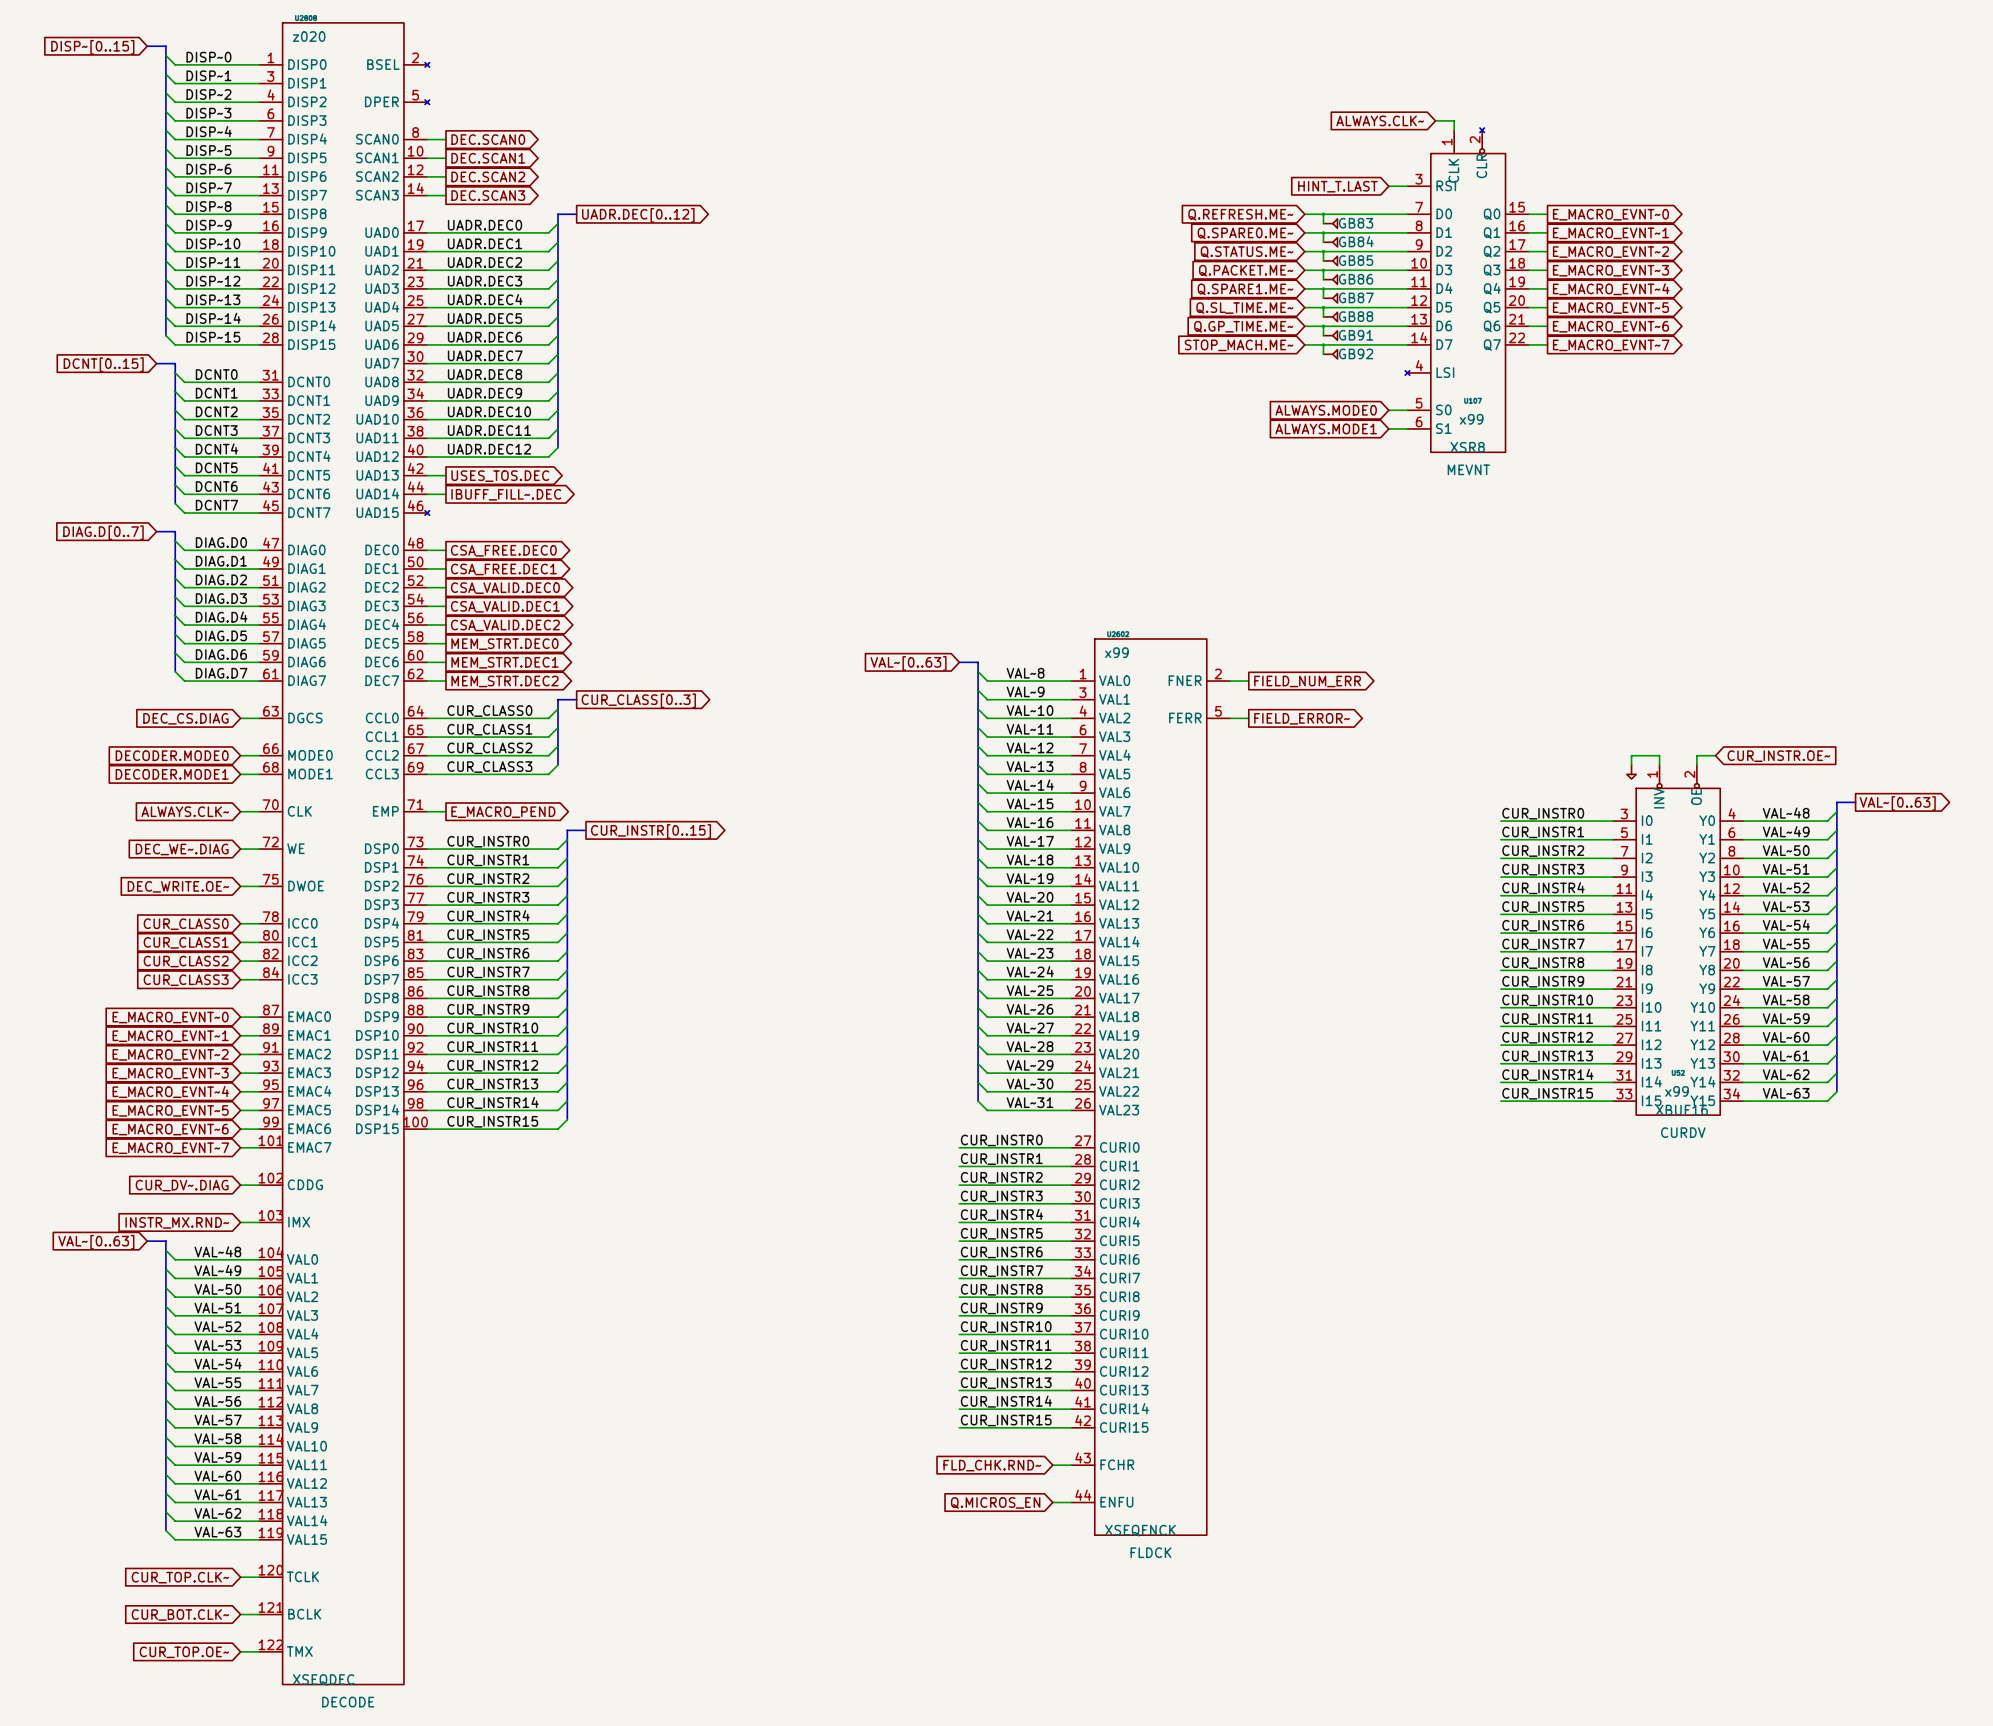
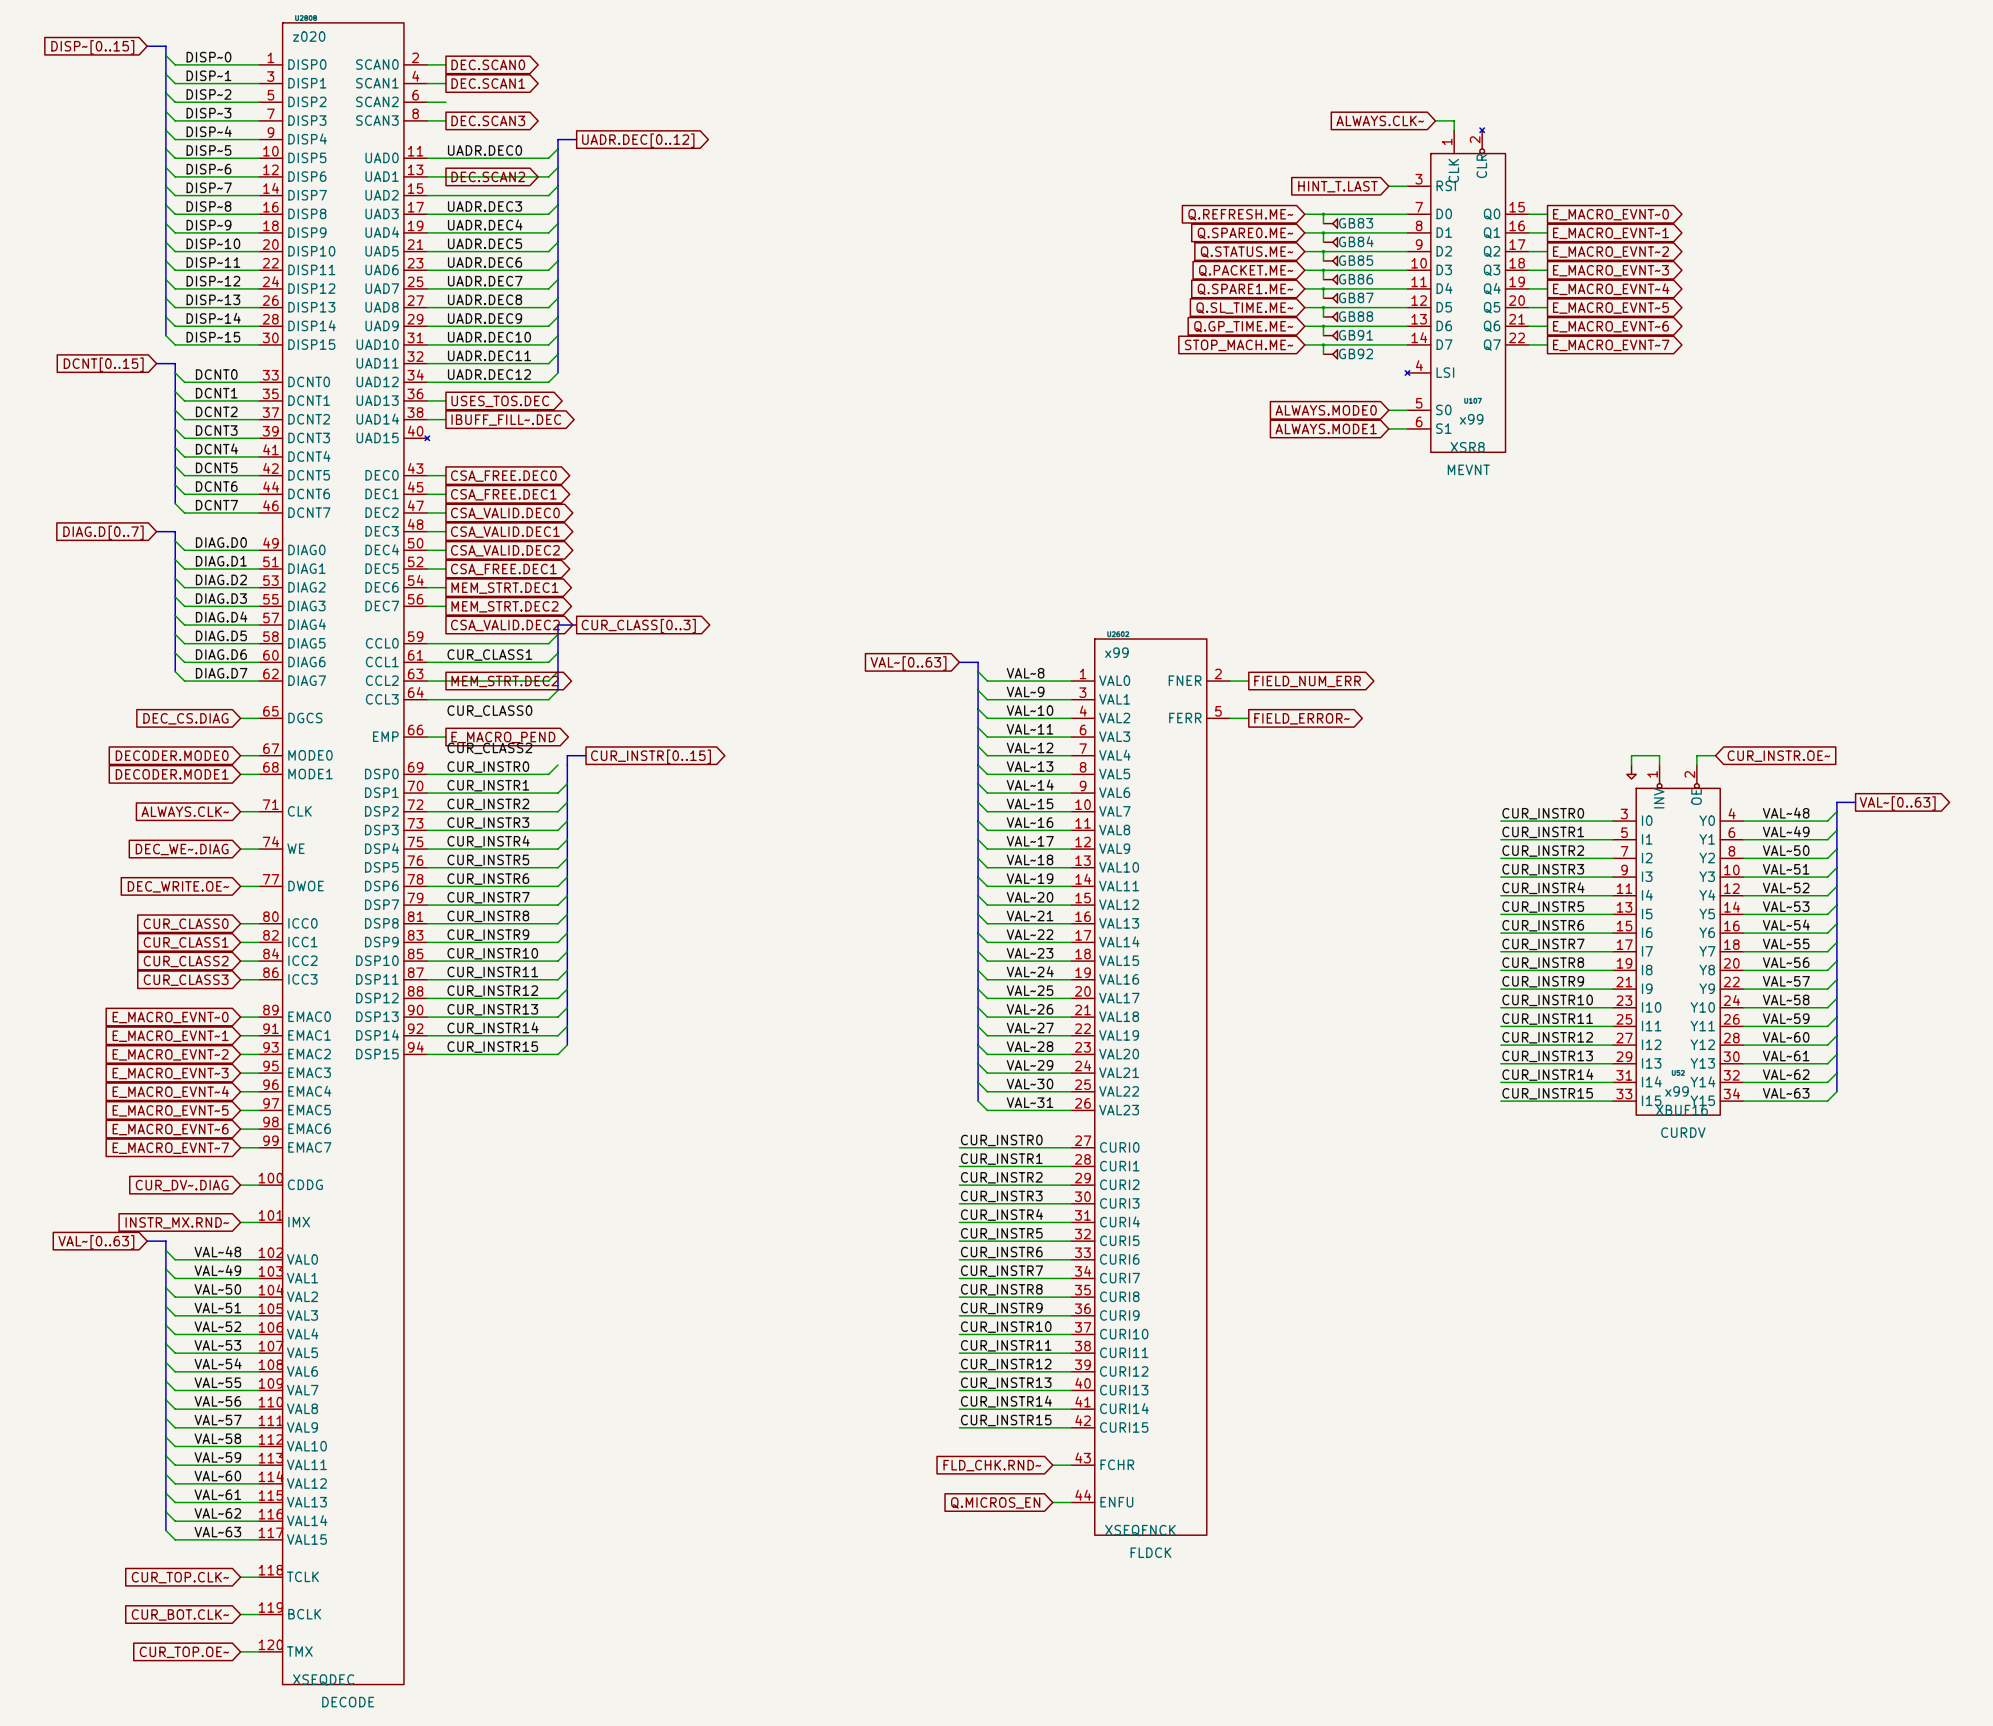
part symbol: [259, 22, 428, 1685] -> [259, 22, 428, 1685]
wire: none -> (427, 64) (445, 64)
no-connect mark: (427, 64) -> none
wire: none -> (427, 102) (445, 102)
no-connect mark: (427, 102) -> none
wire: none -> (427, 120) (445, 120)
wire: (427, 139) (445, 139) -> (427, 83) (445, 83)
global label position: DEC.SCAN0 (488, 139) -> DEC.SCAN0 (488, 64)
wire: none -> (557, 148) (548, 158) (445, 158)
label: none -> UADR.DEC0 (485, 150)
global label position: DEC.SCAN1 (488, 158) -> DEC.SCAN1 (488, 83)
wire: none -> (557, 167) (548, 176) (445, 176)
wire: none -> (557, 186) (548, 195) (445, 195)
global label position: DEC.SCAN3 (488, 195) -> DEC.SCAN3 (488, 120)
wire: none -> (557, 204) (548, 214) (427, 214)
label: none -> UADR.DEC3 (485, 206)
bus: (557, 214) (576, 214) -> (557, 214) (557, 139) (576, 139)
global label position: UADR.DEC[0..12] (638, 215) -> UADR.DEC[0..12] (638, 140)
label: UADR.DEC0 (485, 225) -> UADR.DEC4 (485, 224)
label: UADR.DEC1 (485, 243) -> UADR.DEC5 (485, 243)
label: UADR.DEC2 (485, 262) -> UADR.DEC6 (485, 262)
label: UADR.DEC3 (485, 281) -> UADR.DEC7 (485, 281)
label: UADR.DEC4 (485, 299) -> UADR.DEC8 (485, 299)
label: UADR.DEC5 (485, 318) -> UADR.DEC9 (485, 318)
label: UADR.DEC6 (485, 337) -> UADR.DEC10 (489, 337)
label: UADR.DEC7 (485, 355) -> UADR.DEC11 (489, 355)
bus: (557, 372) (557, 447) -> none
label: UADR.DEC8 (485, 374) -> UADR.DEC12 (489, 374)
wire: (557, 391) (548, 400) (445, 400) -> none
label: UADR.DEC9 (485, 393) -> none
global label: none -> USES_TOS.DEC (500, 401)
wire: (557, 410) (548, 419) (445, 419) -> none
label: UADR.DEC10 (489, 411) -> none
global label: none -> IBUFF_FILL~.DEC (506, 420)
wire: (557, 428) (548, 438) (427, 438) -> none
label: UADR.DEC11 (489, 430) -> none
no-connect mark: none -> (427, 438)
wire: (557, 447) (548, 456) (427, 456) -> none
label: UADR.DEC12 (489, 449) -> none
global label: USES_TOS.DEC (500, 476) -> CSA_FREE.DEC0 (503, 476)
global label: IBUFF_FILL~.DEC (506, 494) -> CSA_FREE.DEC1 (503, 494)
wire: none -> (427, 512) (445, 512)
no-connect mark: (427, 512) -> none
global label: none -> CSA_VALID.DEC0 (505, 513)
wire: none -> (427, 531) (445, 531)
global label: none -> CSA_VALID.DEC1 (505, 532)
global label: CSA_FREE.DEC0 (503, 550) -> CSA_VALID.DEC2 (505, 550)
global label: CSA_VALID.DEC0 (505, 588) -> MEM_STRT.DEC1 (504, 588)
global label: CSA_VALID.DEC1 (505, 606) -> MEM_STRT.DEC2 (504, 606)
wire: (427, 625) (445, 625) -> none
wire: none -> (557, 634) (548, 643) (445, 643)
global label: MEM_STRT.DEC0 (504, 644) -> none
wire: none -> (557, 653) (548, 662) (445, 662)
global label: MEM_STRT.DEC1 (504, 662) -> none
bus: (576, 699) (557, 699) (557, 765) -> (576, 625) (557, 625) (557, 690)
global label position: CUR_CLASS[0..3] (638, 700) -> CUR_CLASS[0..3] (638, 626)
wire: (557, 709) (548, 718) (427, 718) -> none
wire: (557, 727) (548, 737) (445, 737) -> (557, 671) (548, 681) (445, 681)
label position: CUR_CLASS1 (489, 729) -> CUR_CLASS1 (489, 655)
wire: (557, 746) (548, 755) (427, 755) -> (557, 690) (548, 699) (427, 699)
label: CUR_CLASS3 (489, 767) -> CUR_INSTR0 (488, 767)
wire: none -> (567, 783) (557, 793) (427, 793)
label: none -> CUR_INSTR1 (488, 785)
wire: none -> (567, 802) (557, 811) (445, 811)
label: none -> CUR_INSTR2 (488, 804)
global label position: E_MACRO_PEND (503, 812) -> E_MACRO_PEND (503, 737)
wire: none -> (567, 821) (557, 830) (427, 830)
label: none -> CUR_INSTR3 (488, 823)
bus: (567, 830) (586, 830) -> (567, 830) (567, 755) (586, 755)
global label position: CUR_INSTR[0..15] (650, 831) -> CUR_INSTR[0..15] (650, 756)
label: CUR_INSTR0 (488, 841) -> CUR_INSTR4 (488, 841)
label: CUR_INSTR1 (488, 860) -> CUR_INSTR5 (488, 860)
label: CUR_INSTR2 (488, 879) -> CUR_INSTR6 (488, 879)
label: CUR_INSTR3 (488, 897) -> CUR_INSTR7 (488, 897)
label: CUR_INSTR4 (488, 916) -> CUR_INSTR8 (488, 916)
label: CUR_INSTR5 (488, 935) -> CUR_INSTR9 (488, 935)
label: CUR_INSTR6 (488, 953) -> CUR_INSTR10 (492, 953)
label: CUR_INSTR7 (488, 972) -> CUR_INSTR11 (492, 972)
label: CUR_INSTR8 (488, 991) -> CUR_INSTR12 (492, 991)
label: CUR_INSTR9 (488, 1009) -> CUR_INSTR13 (492, 1009)
label: CUR_INSTR10 (492, 1028) -> CUR_INSTR14 (493, 1028)
bus: (567, 1045) (567, 1119) -> none
label: CUR_INSTR11 (492, 1047) -> CUR_INSTR15 (492, 1047)
wire: (567, 1063) (557, 1073) (427, 1073) -> none
label: CUR_INSTR12 (492, 1065) -> none
wire: (567, 1082) (557, 1091) (427, 1091) -> none
label: CUR_INSTR13 (492, 1084) -> none
wire: (567, 1101) (557, 1110) (427, 1110) -> none
label: CUR_INSTR14 (493, 1102) -> none
wire: (567, 1119) (557, 1129) (427, 1129) -> none
label: CUR_INSTR15 (492, 1121) -> none

